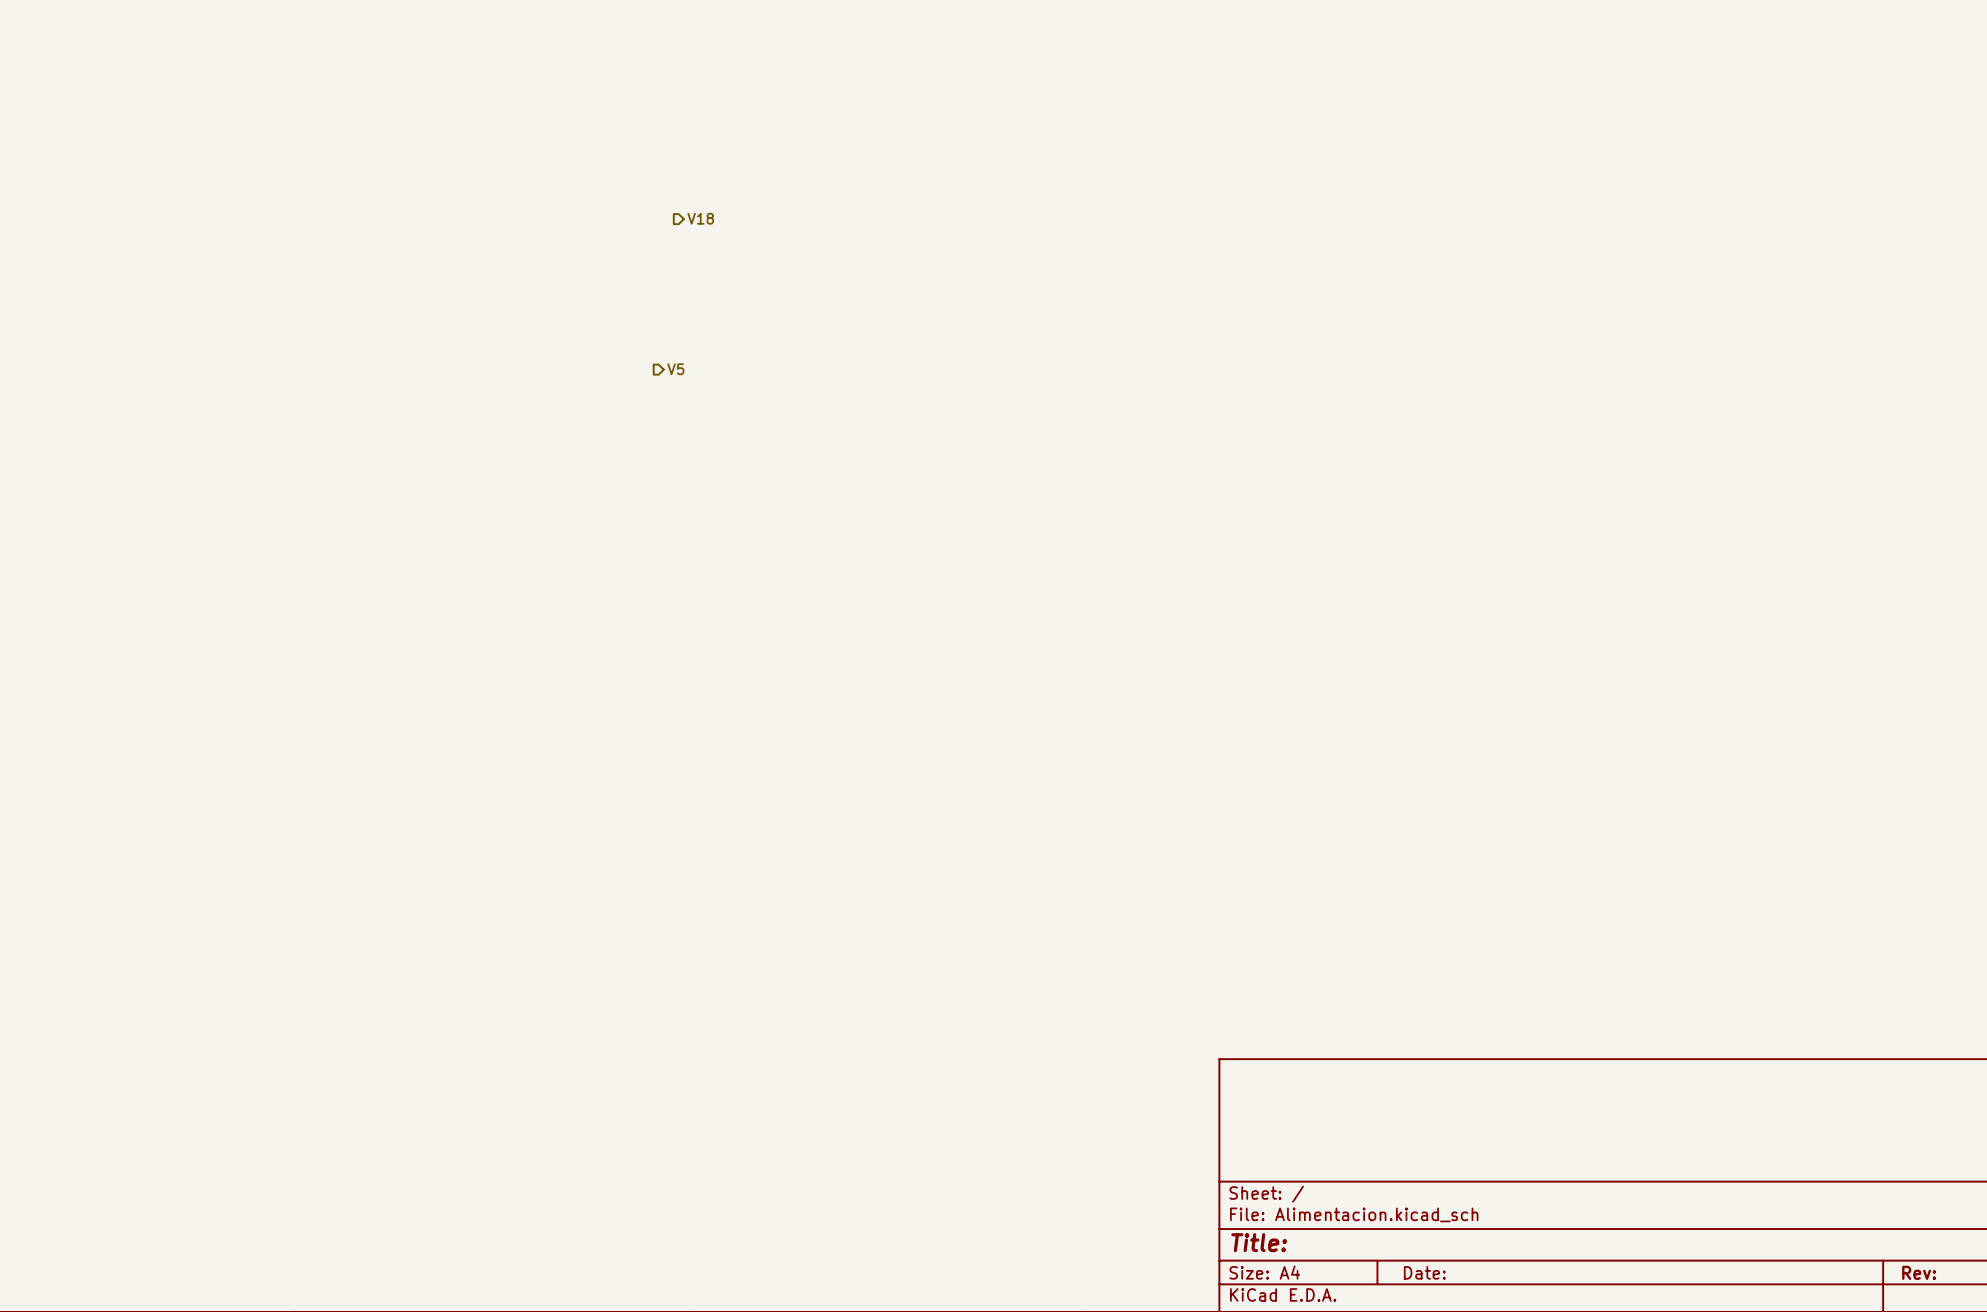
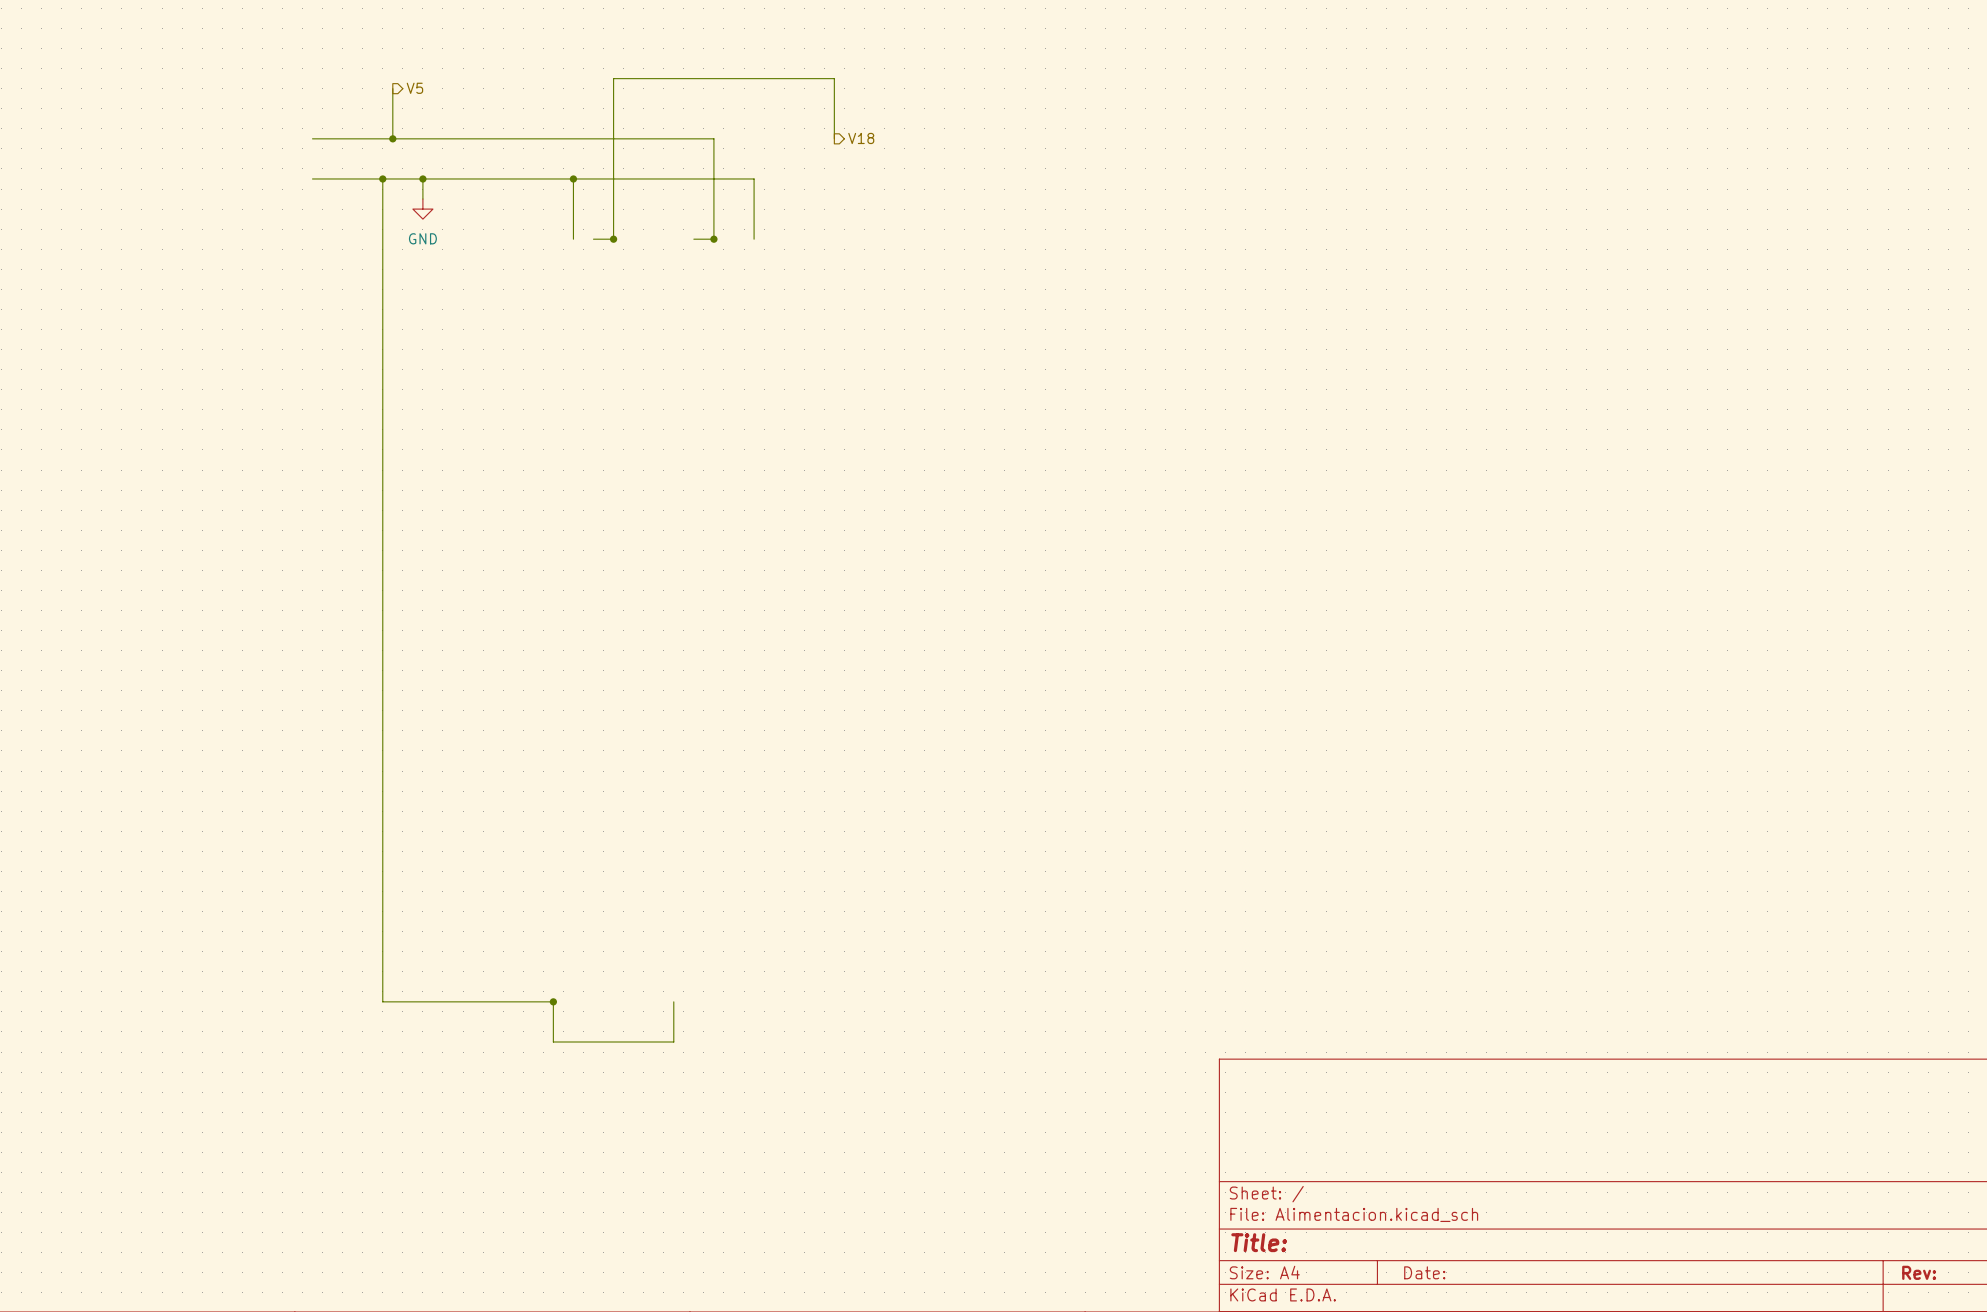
wire: none -> (392, 88) (392, 138)
hierarchical label: none -> V5 (414, 88)
wire: none -> (312, 138) (713, 138) (713, 239) (693, 239)
junction: none -> (392, 138)
wire: none -> (834, 138) (834, 78) (613, 78) (613, 239) (593, 239)
wire: none -> (312, 178) (754, 178) (754, 239)
wire: none -> (382, 178) (382, 1001) (553, 1001) (553, 1042) (673, 1042) (673, 1001)
junction: none -> (382, 178)
wire: none -> (422, 178) (422, 199)
junction: none -> (422, 178)
wire: none -> (573, 178) (573, 239)
junction: none -> (573, 178)
power symbol: none -> GND (422, 209)
hierarchical label position: V18 (700, 218) -> V18 (861, 138)
junction: none -> (613, 239)
junction: none -> (713, 239)
hierarchical label: V5 (675, 369) -> none
junction: none -> (553, 1001)

